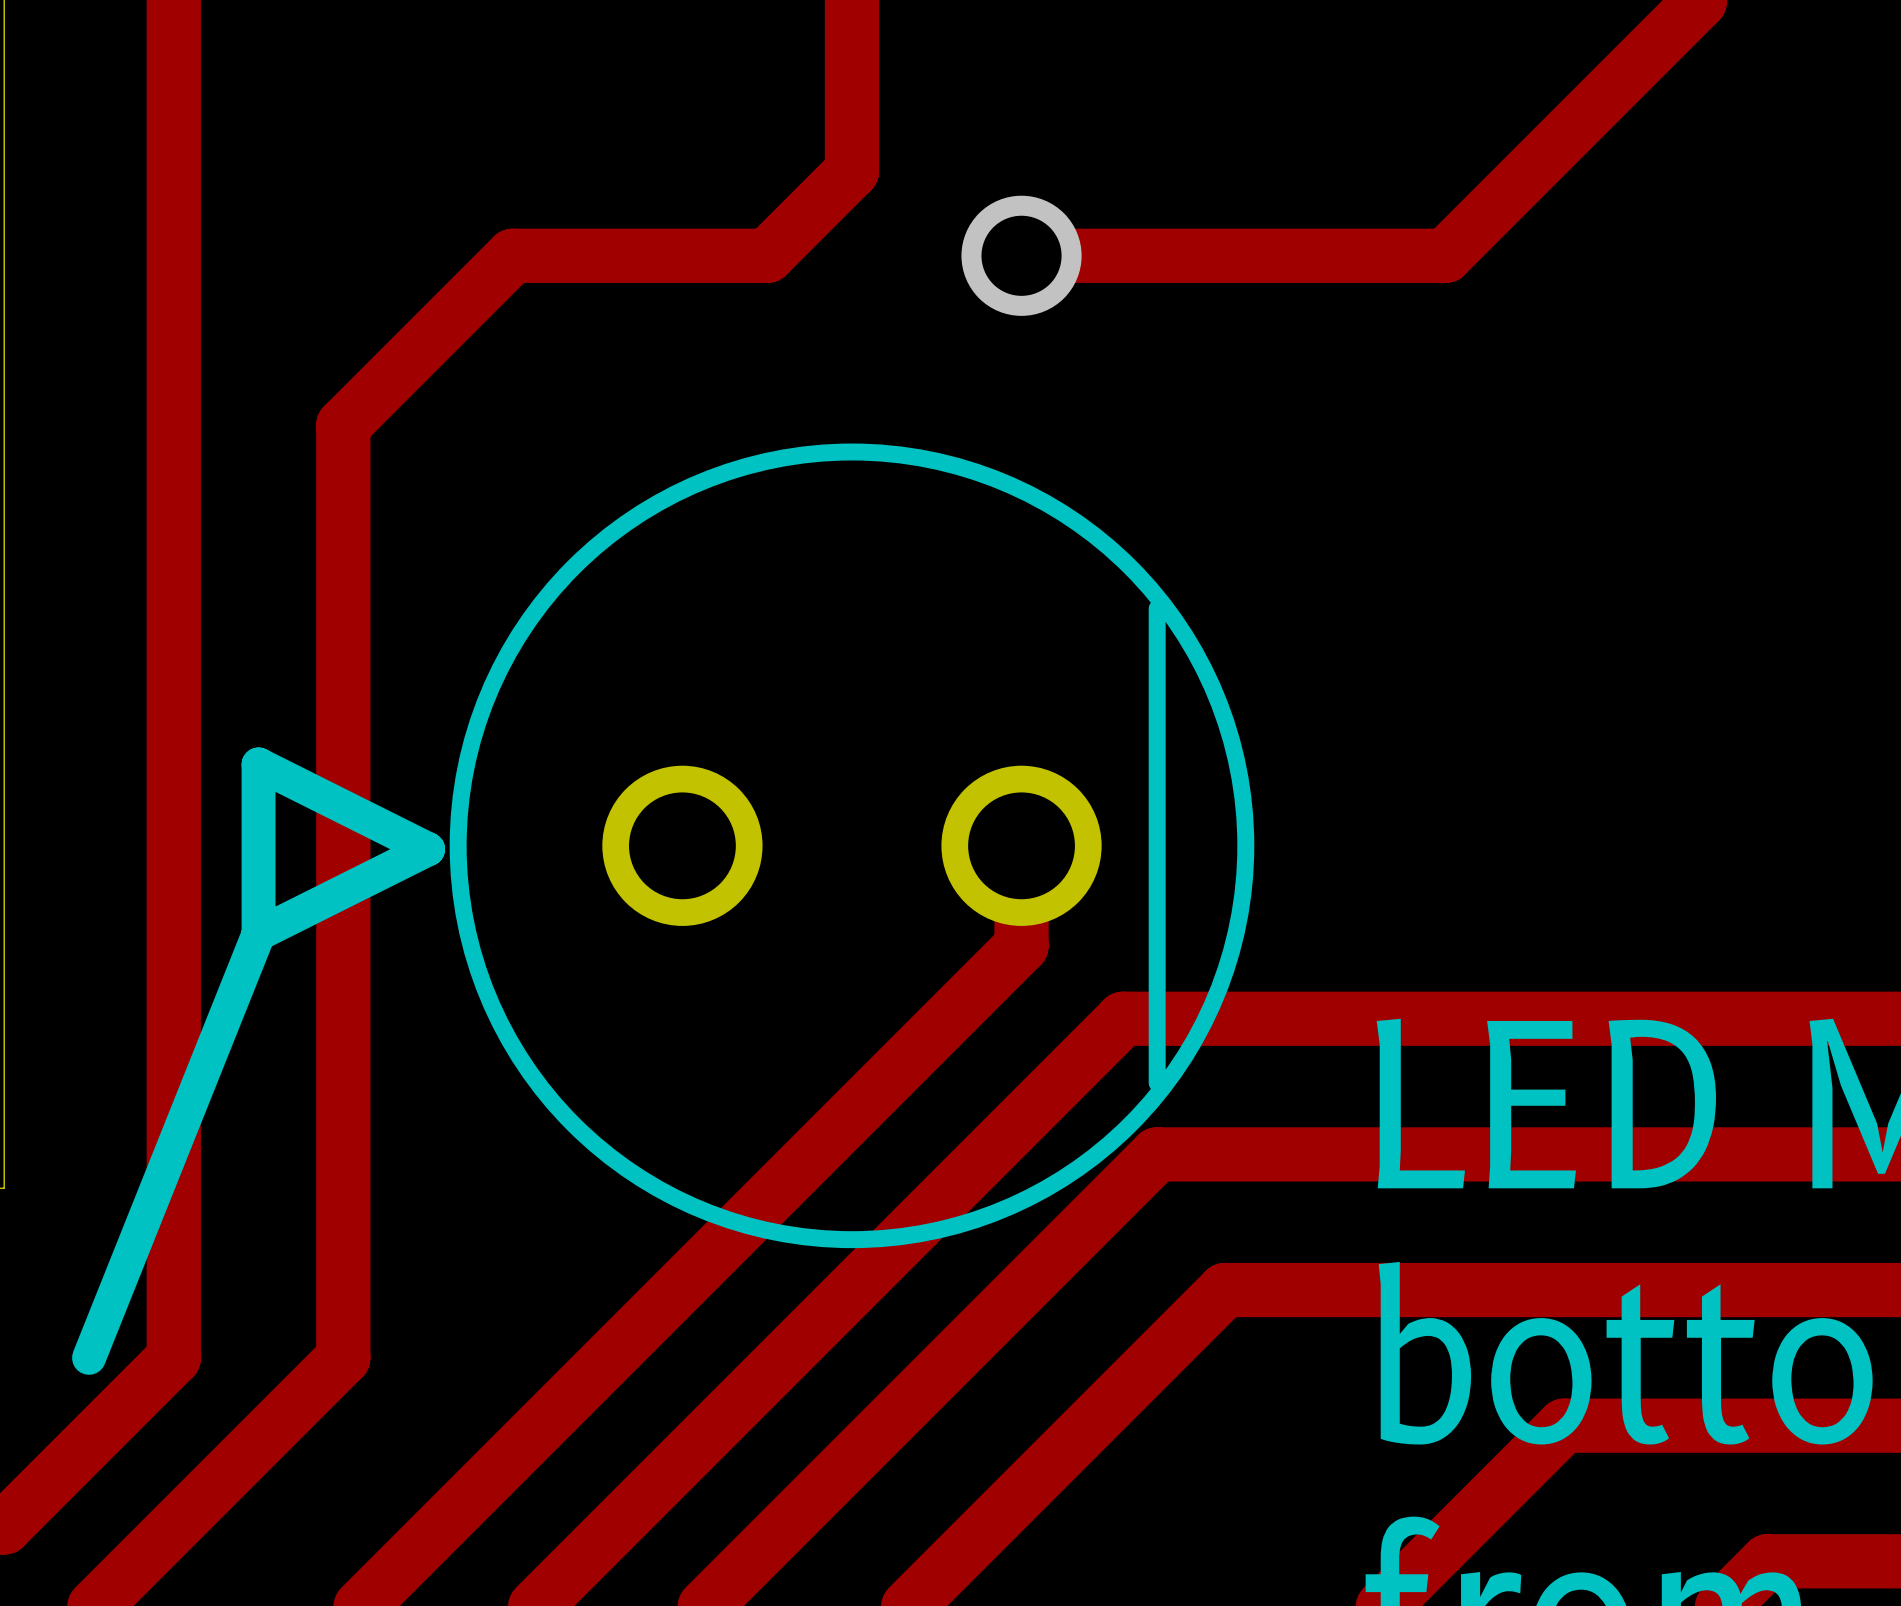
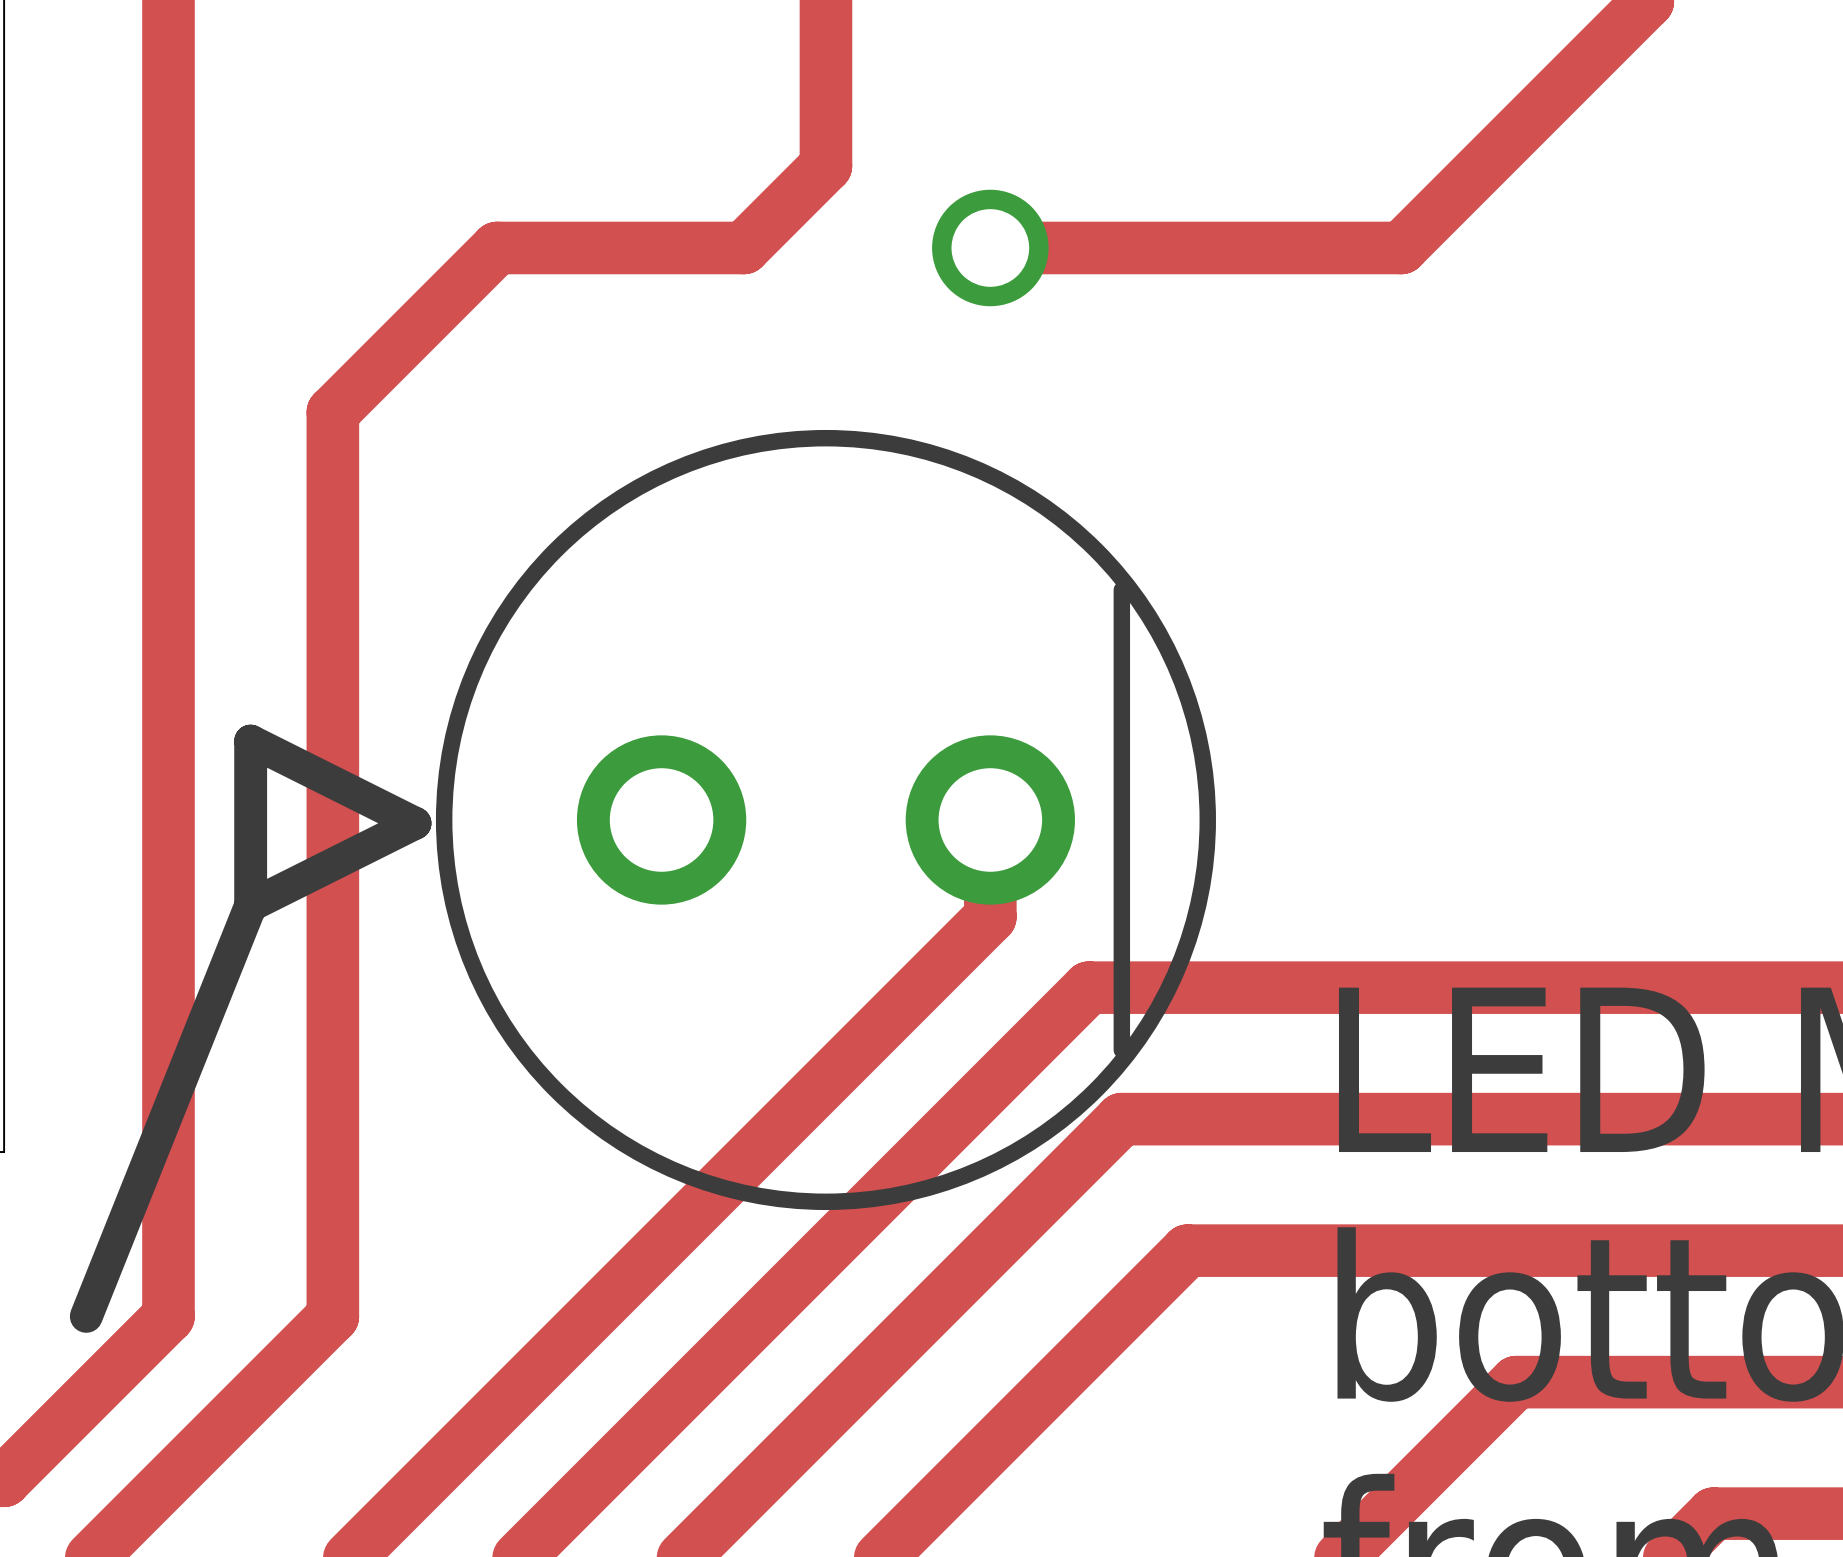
part footprint: [449, 443, 1255, 1249] -> [435, 429, 1216, 1211]

